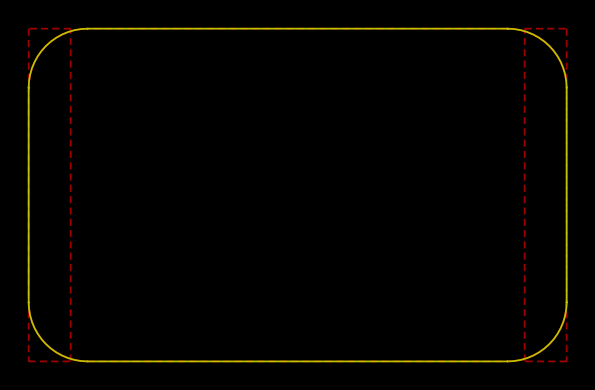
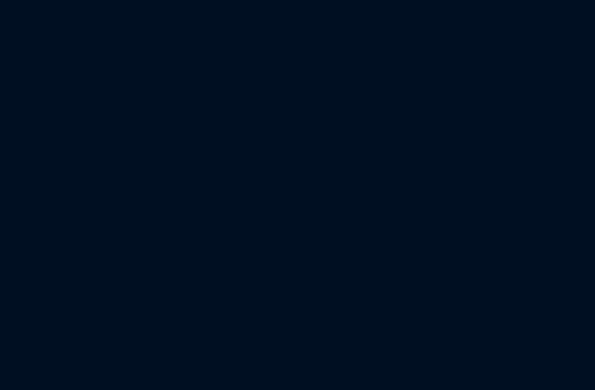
zone outline: (28, 28) (70, 28) (70, 361) (28, 361) (28, 28) -> none
board edge: (87, 28) (507, 28) (527, 31) (539, 37) (557, 56) (566, 81) (566, 302) (563, 321) (557, 333) (539, 352) (527, 358) (507, 361) (87, 361) (68, 358) (56, 352) (37, 333) (29, 308) (29, 81) (37, 56) (50, 41) (68, 31) (87, 28) -> none
zone outline: (524, 28) (566, 28) (566, 361) (524, 361) (524, 28) -> none

